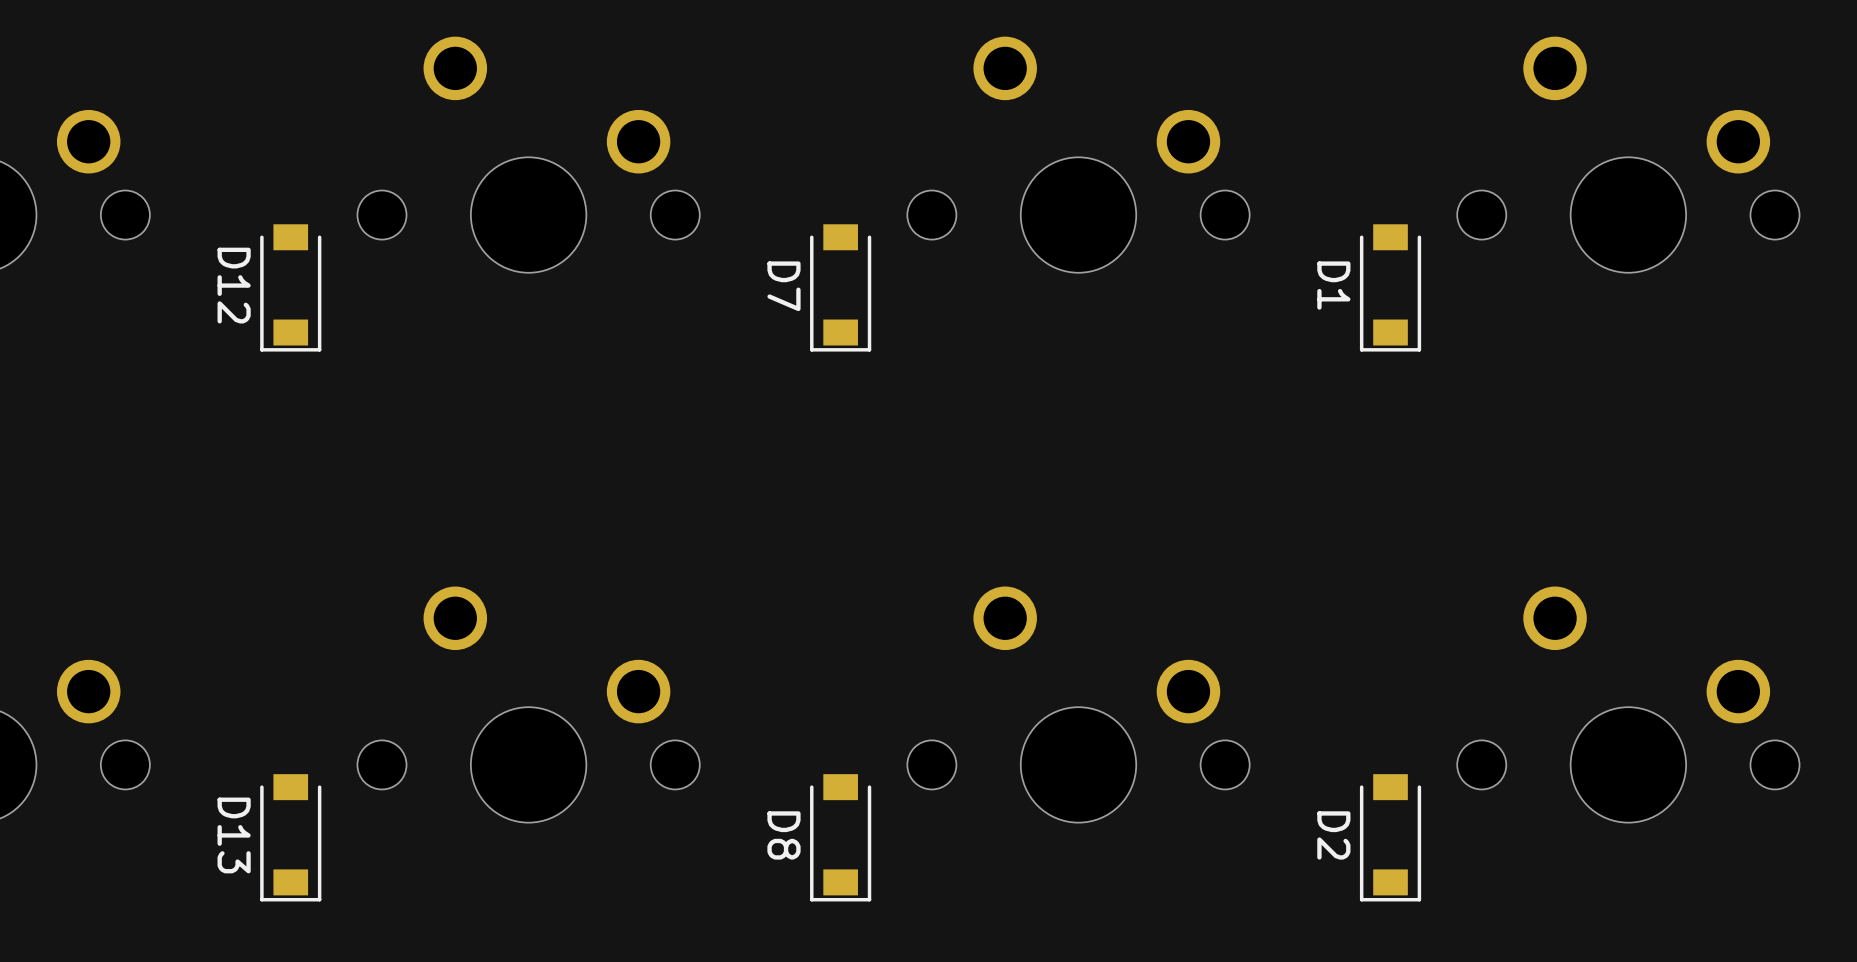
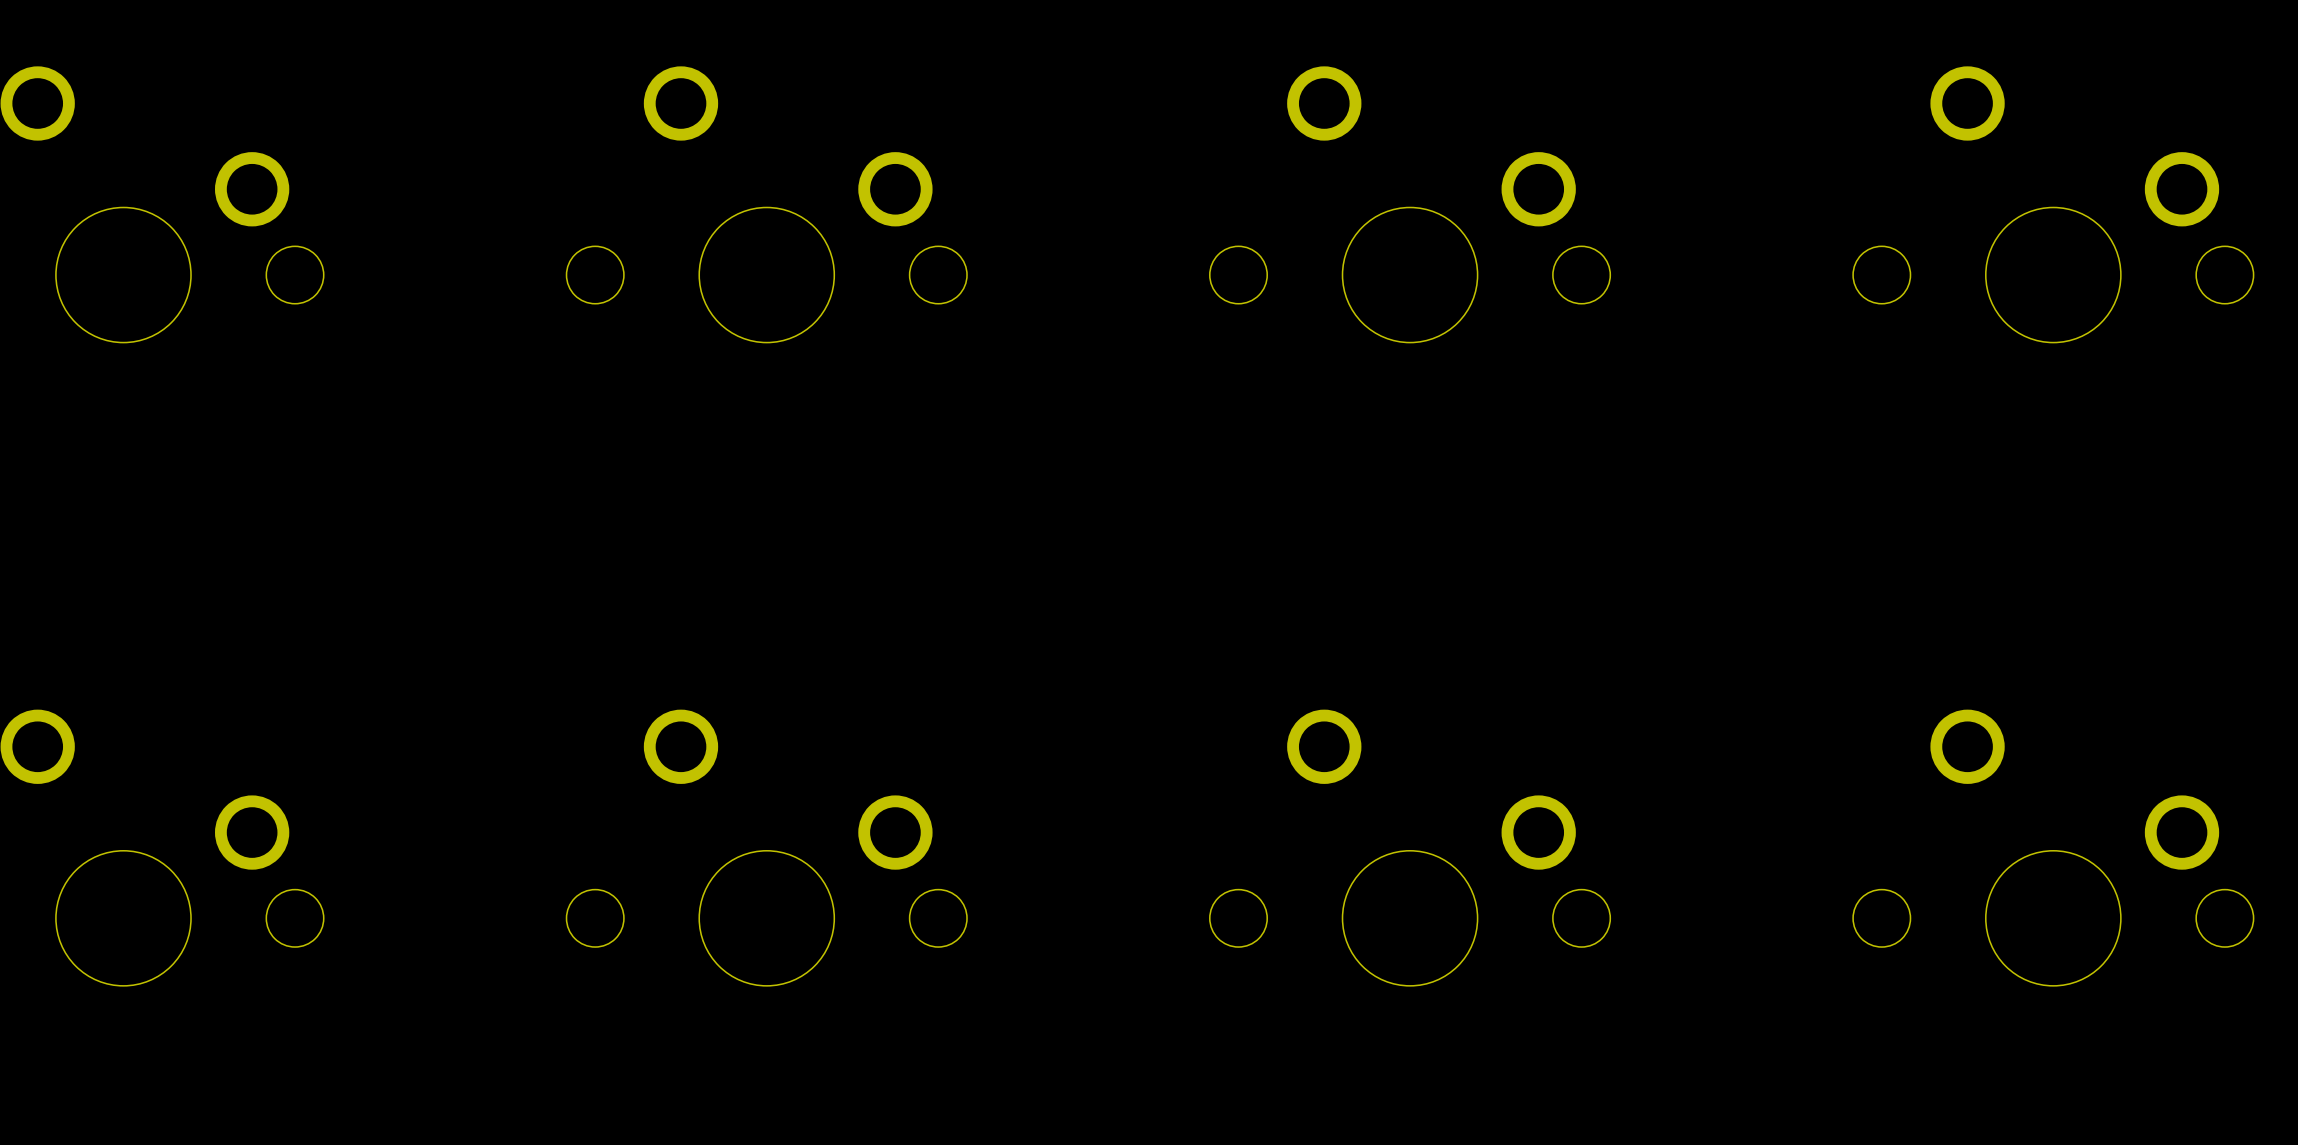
D12: (290, 287) -> none
D7: (840, 287) -> none
D1: (1390, 287) -> none
D13: (290, 837) -> none
D8: (840, 837) -> none
D2: (1390, 837) -> none

